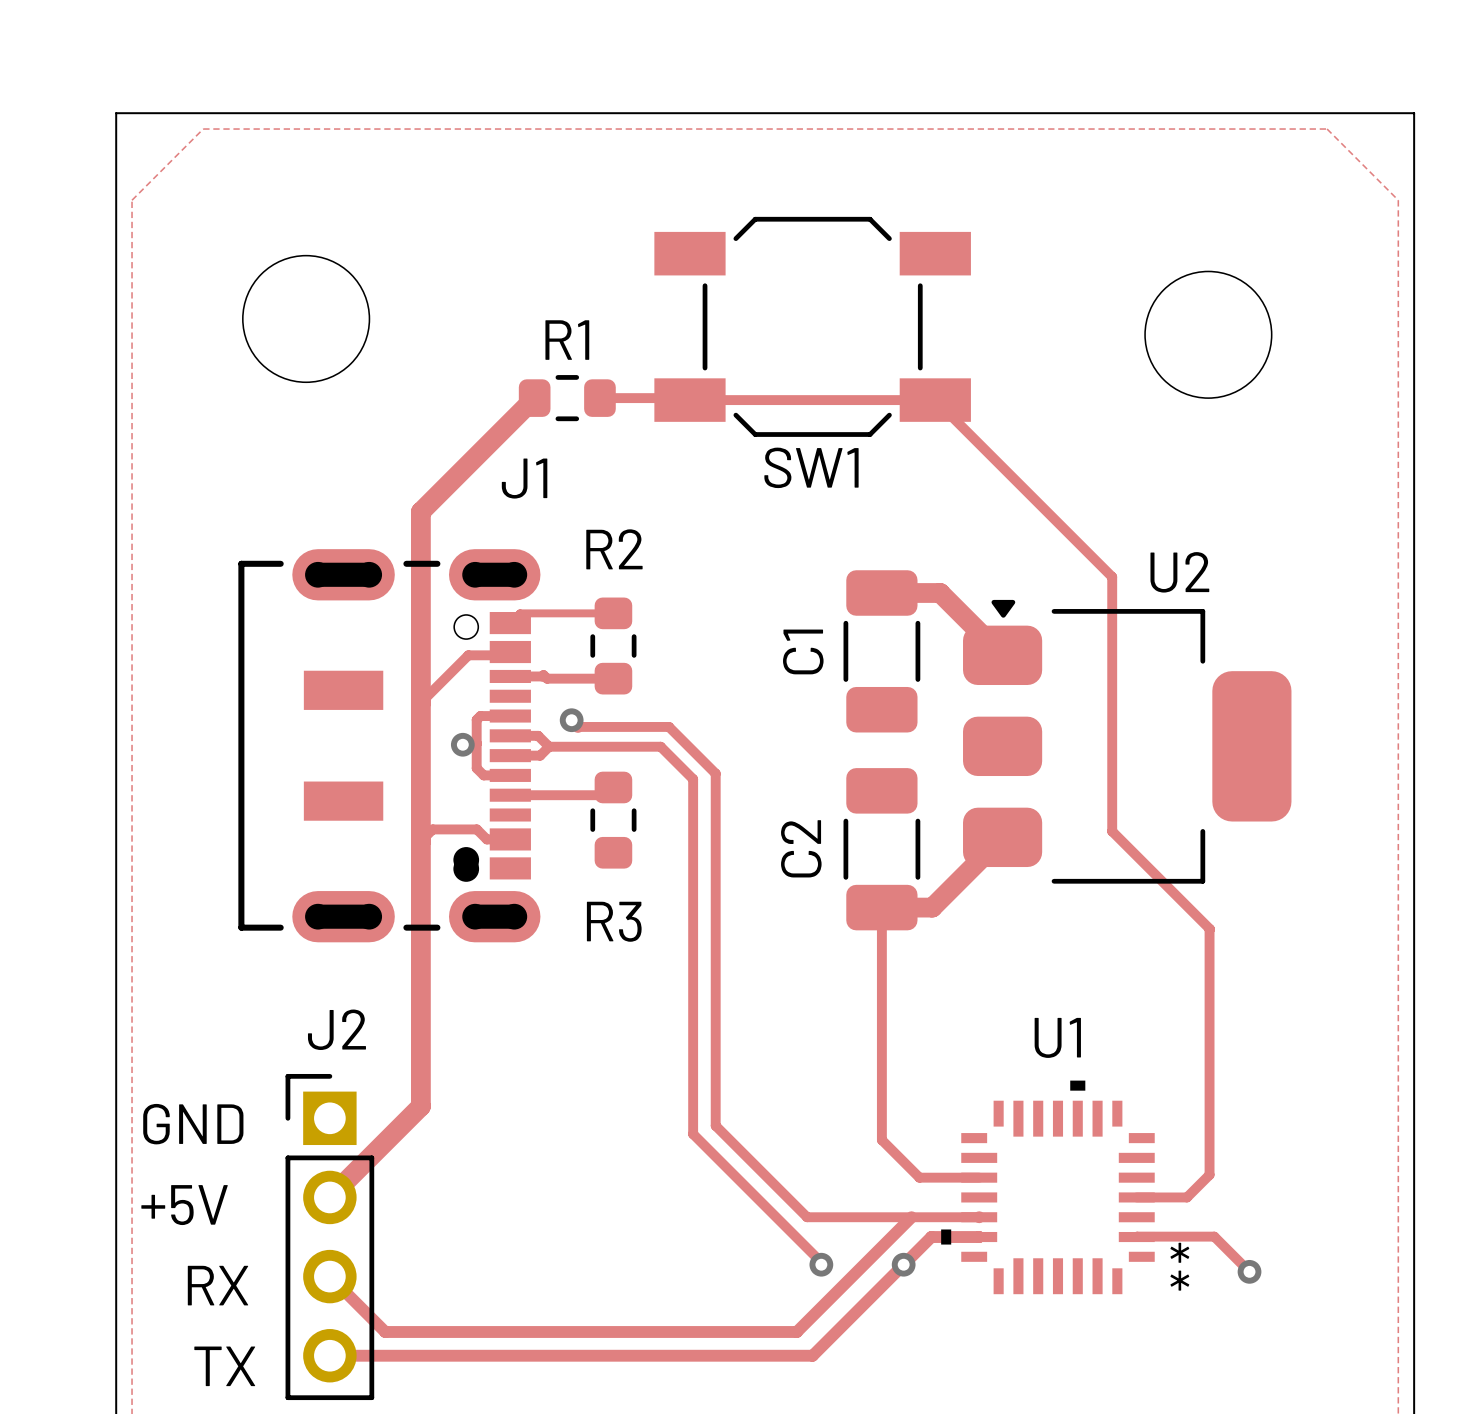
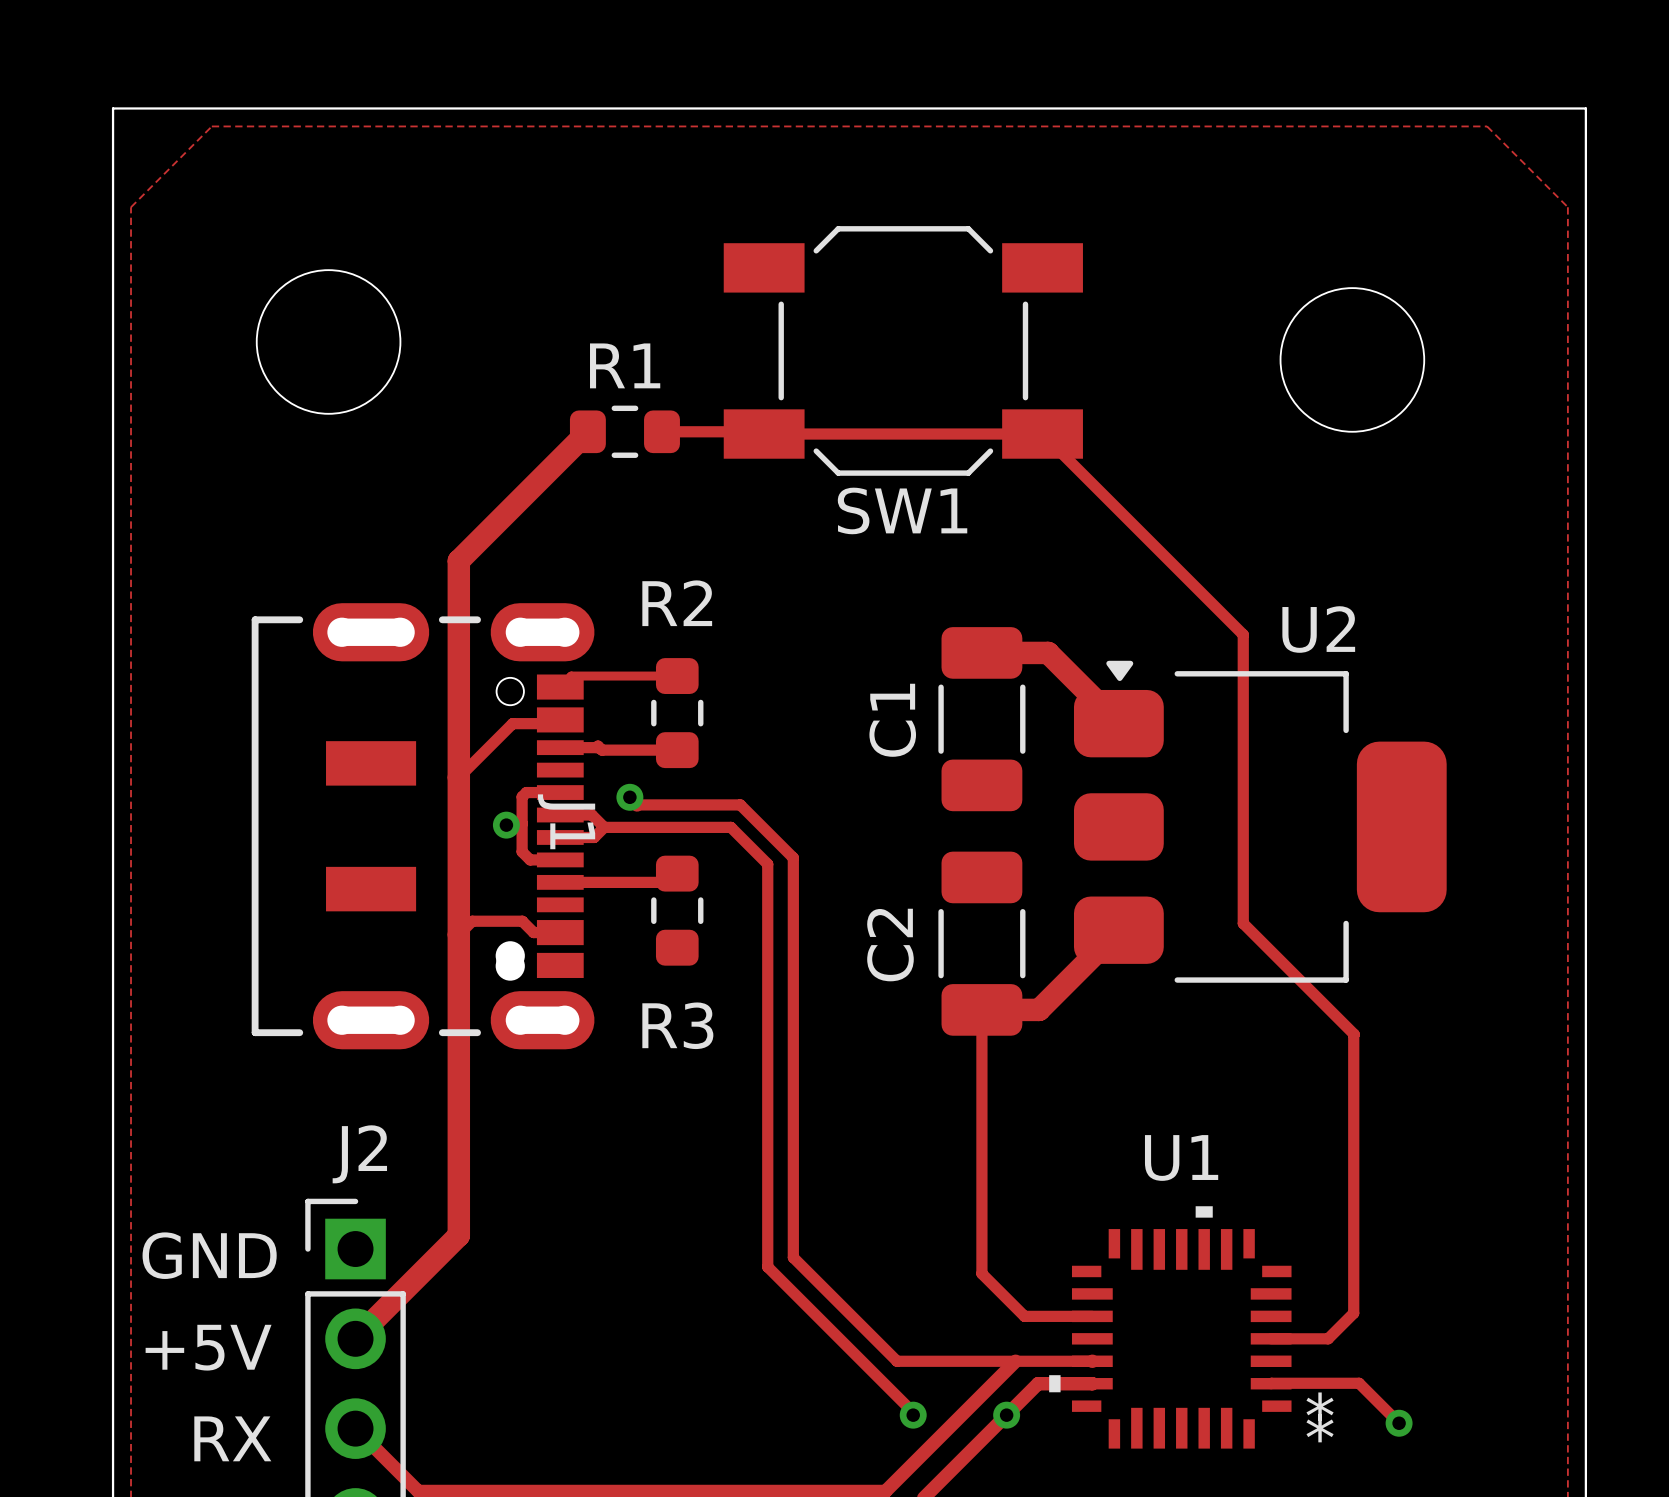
J1 name rotation: 0° (524, 478) -> 90° clockwise (566, 821)
J1 name position: J1 (524, 478) -> J1 (566, 821)

